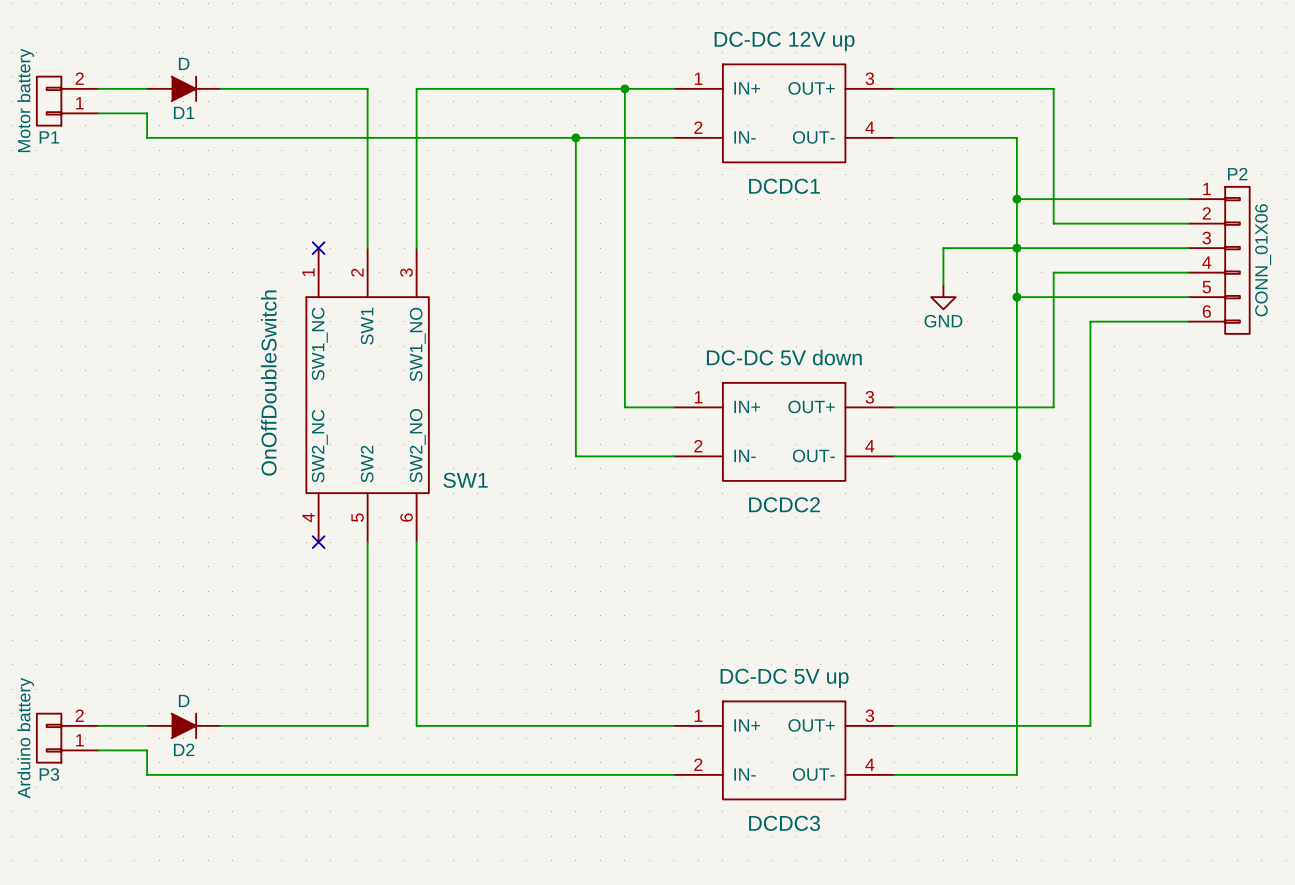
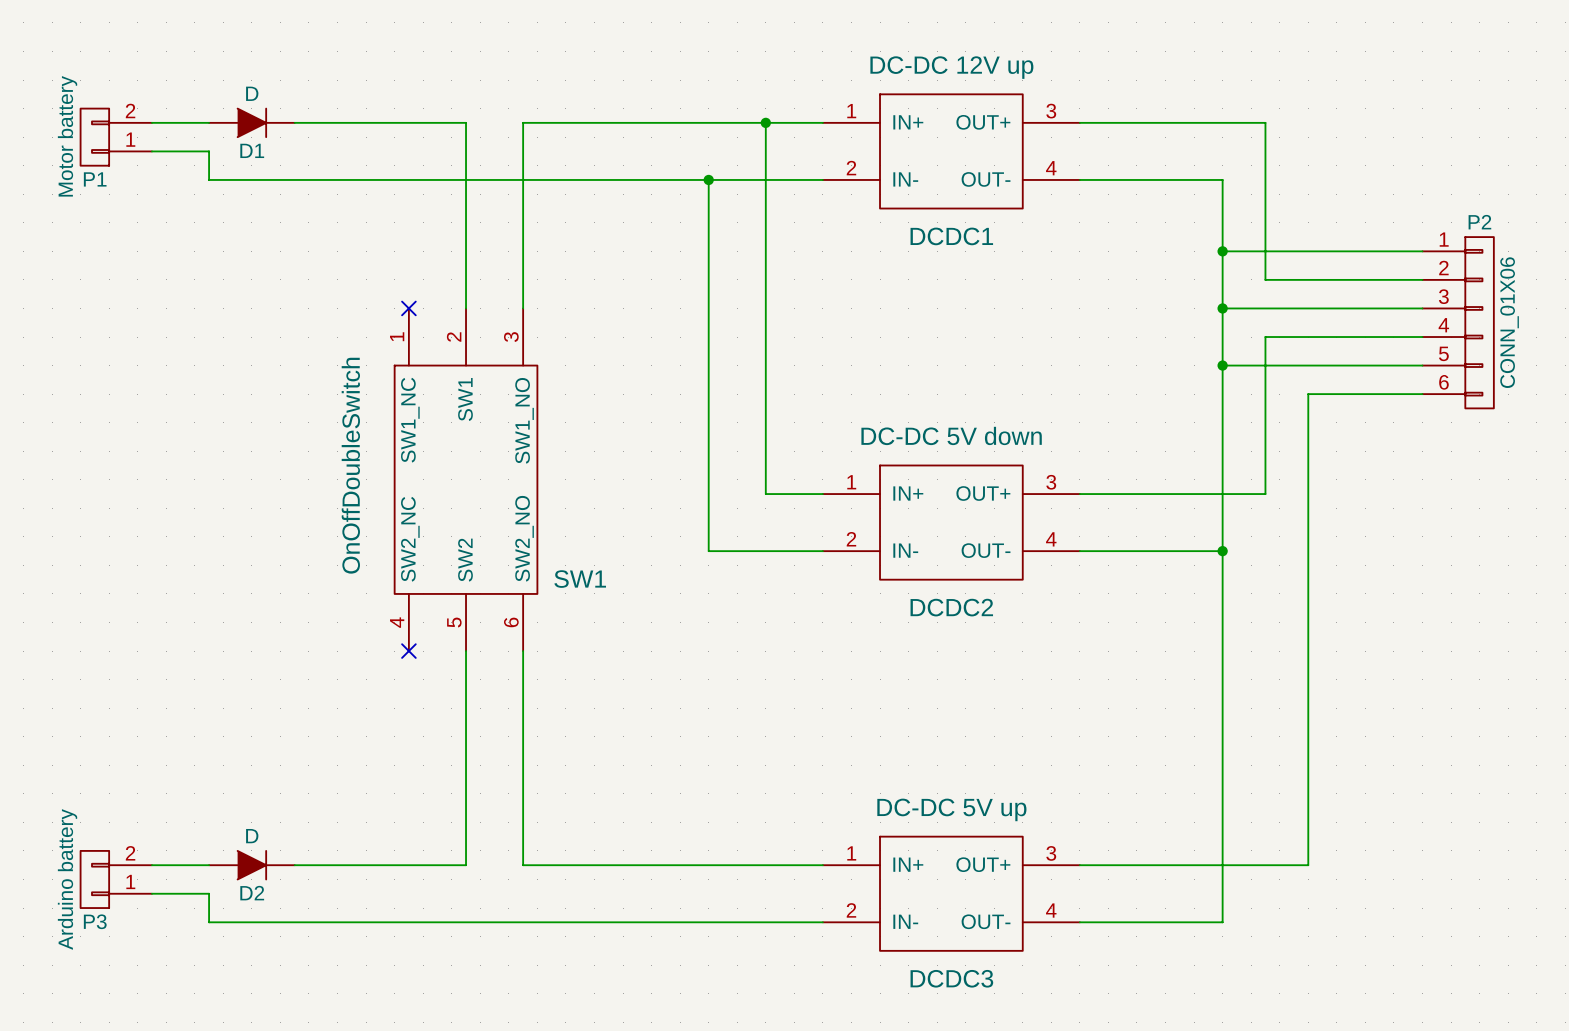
wire: (1016, 248) (943, 248) (943, 284) -> none
power symbol: GND (943, 297) -> none

